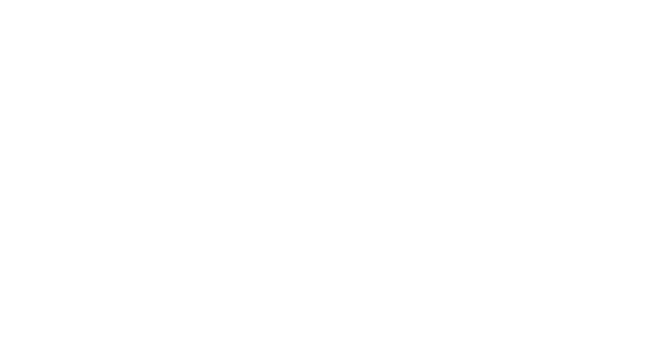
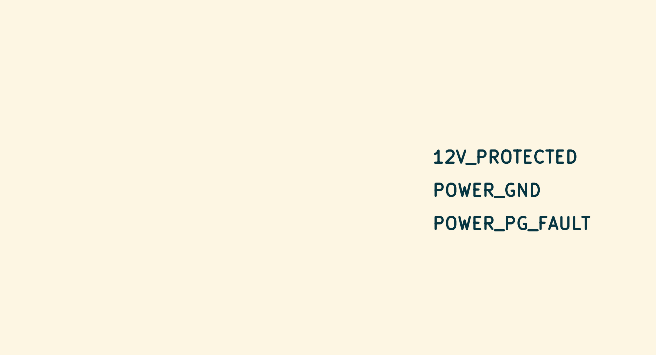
label: none -> 12V_PROTECTED (505, 157)
label: none -> POWER_GND (487, 190)
label: none -> POWER_PG_FAULT (512, 223)

